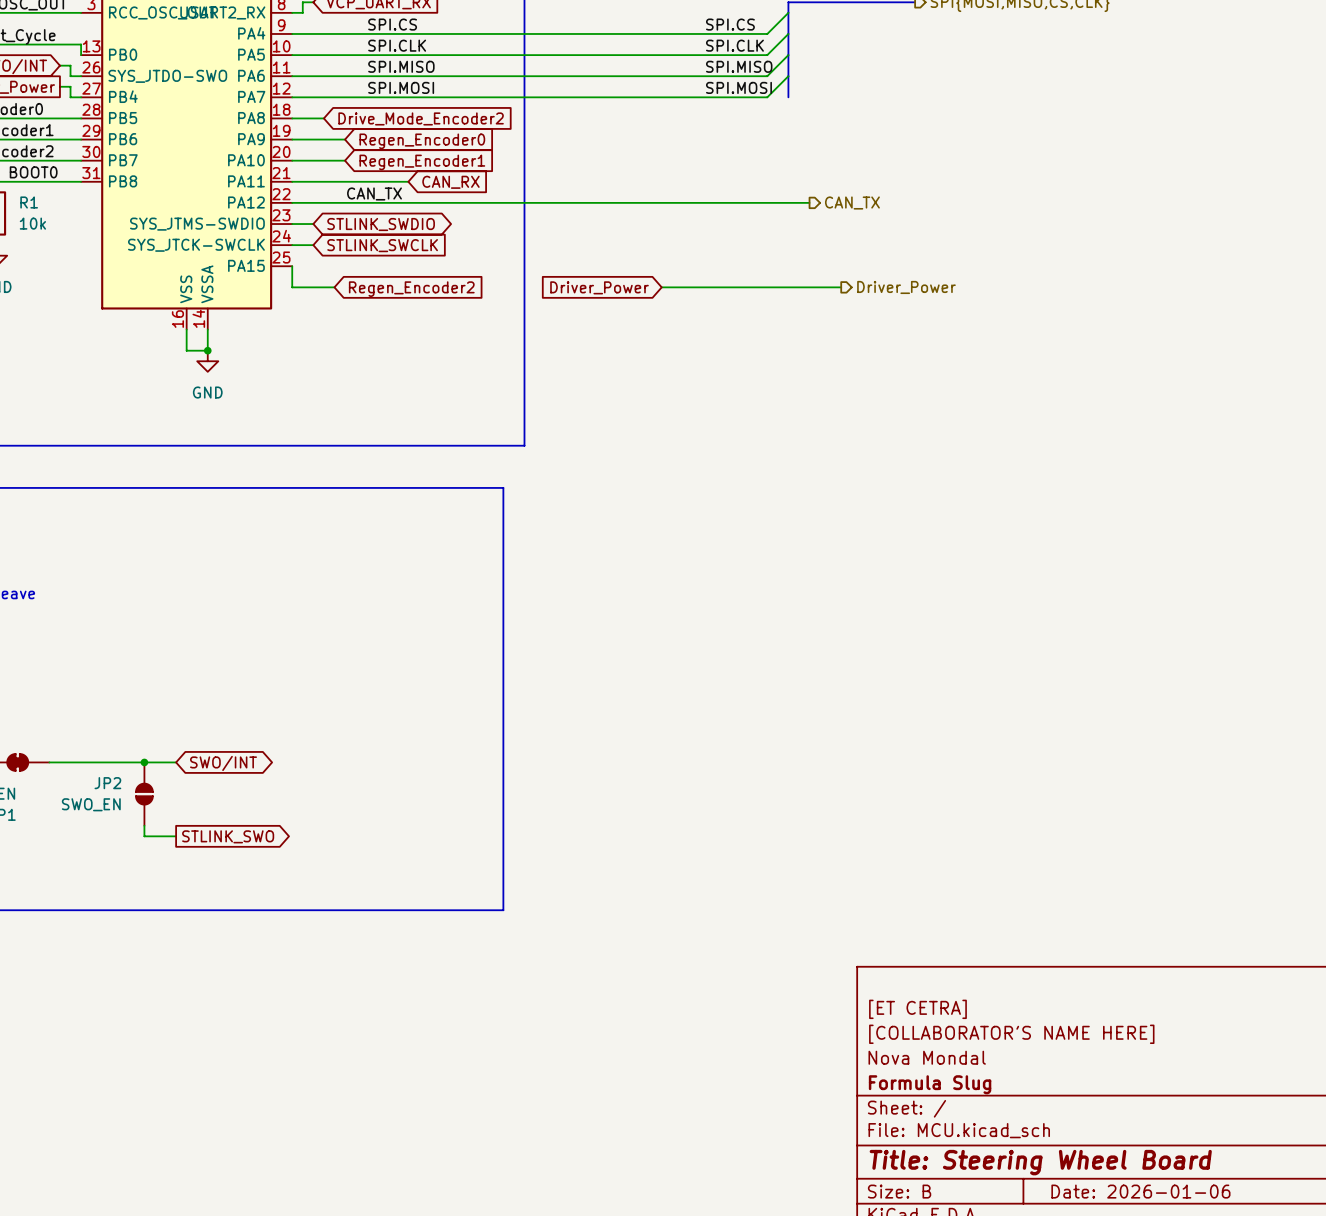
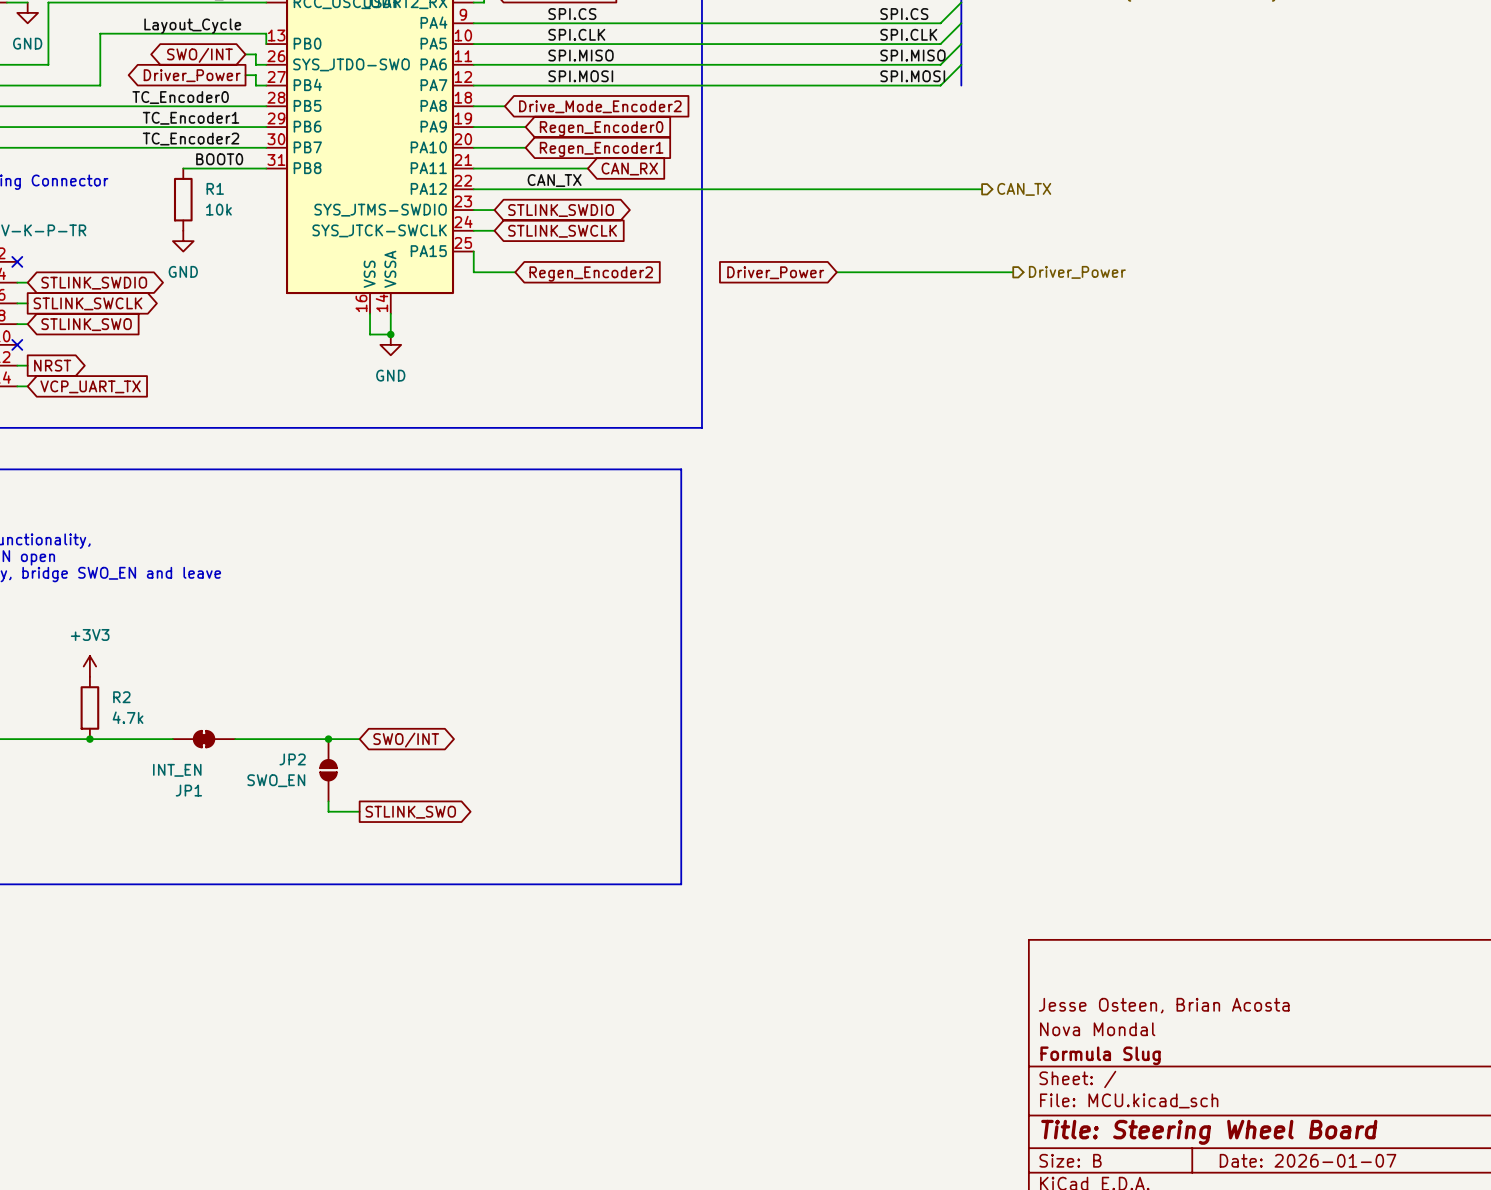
title block: [ET CETRA] (917, 1009) -> none
title block: [COLLABORATOR'S NAME HERE] (1011, 1034) -> Jesse Osteen, Brian Acosta (1164, 1005)
title block: Date: 2026-01-06 (1140, 1191) -> Date: 2026-01-07 (1308, 1160)

